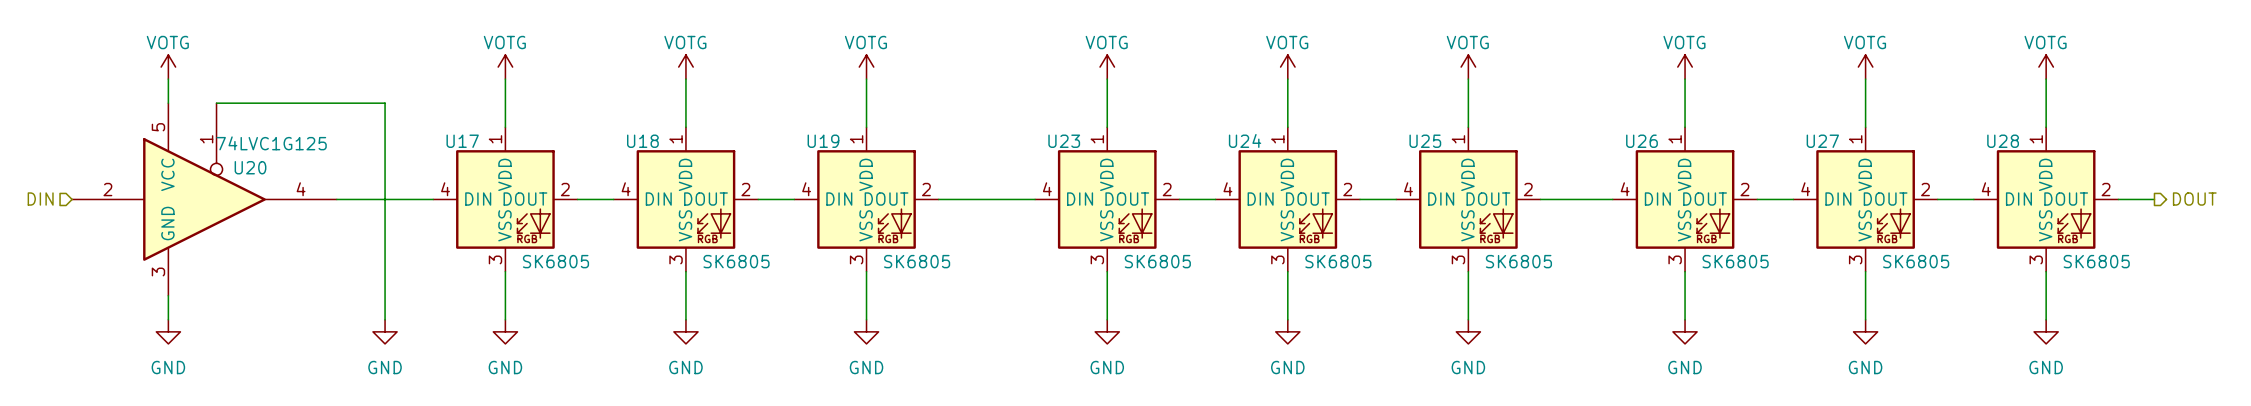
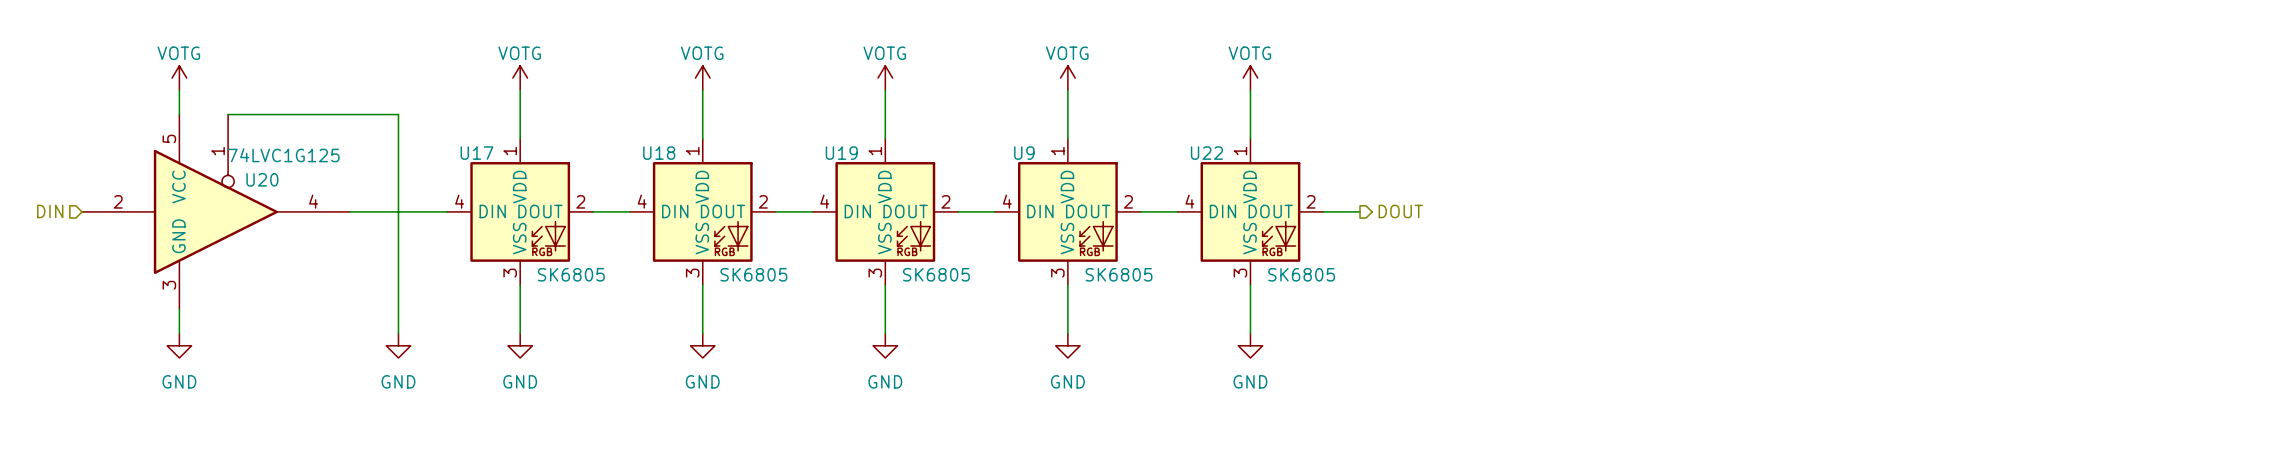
power symbol: none -> VOTG (1067, 78)
power symbol: VOTG (1107, 67) -> none
power symbol: none -> VOTG (1250, 78)
power symbol: VOTG (1287, 67) -> none
power symbol: VOTG (1468, 67) -> none
power symbol: VOTG (1685, 67) -> none
power symbol: VOTG (1865, 67) -> none
power symbol: VOTG (2046, 67) -> none
wire: (1107, 79) (1107, 127) -> (1067, 90) (1067, 138)
wire: (1287, 79) (1287, 127) -> (1250, 90) (1250, 138)
wire: (1468, 79) (1468, 127) -> none
wire: (1685, 79) (1685, 127) -> none
wire: (1865, 79) (1865, 127) -> none
wire: (2046, 79) (2046, 127) -> none
U9: none -> SK6805 (1067, 211)
U23: SK6805 (1107, 199) -> none
U22: none -> SK6805 (1250, 211)
U24: SK6805 (1287, 199) -> none
hierarchical label: none -> DOUT (1400, 211)
U25: SK6805 (1468, 199) -> none
wire: (1540, 199) (1612, 199) -> none
U26: SK6805 (1685, 199) -> none
wire: (1757, 199) (1793, 199) -> none
U27: SK6805 (1865, 199) -> none
wire: (1937, 199) (1973, 199) -> none
U28: SK6805 (2046, 199) -> none
wire: (2118, 199) (2154, 199) -> none
hierarchical label: DOUT (2194, 199) -> none
wire: (1107, 271) (1107, 319) -> (1067, 284) (1067, 333)
wire: (1287, 271) (1287, 319) -> (1250, 284) (1250, 333)
wire: (1468, 271) (1468, 319) -> none
wire: (1685, 271) (1685, 319) -> none
wire: (1865, 271) (1865, 319) -> none
wire: (2046, 271) (2046, 319) -> none
power symbol: none -> GND (1067, 345)
power symbol: GND (1107, 331) -> none
power symbol: none -> GND (1250, 345)
power symbol: GND (1287, 331) -> none
power symbol: GND (1468, 331) -> none
power symbol: GND (1685, 331) -> none
power symbol: GND (1865, 331) -> none
power symbol: GND (2046, 331) -> none

